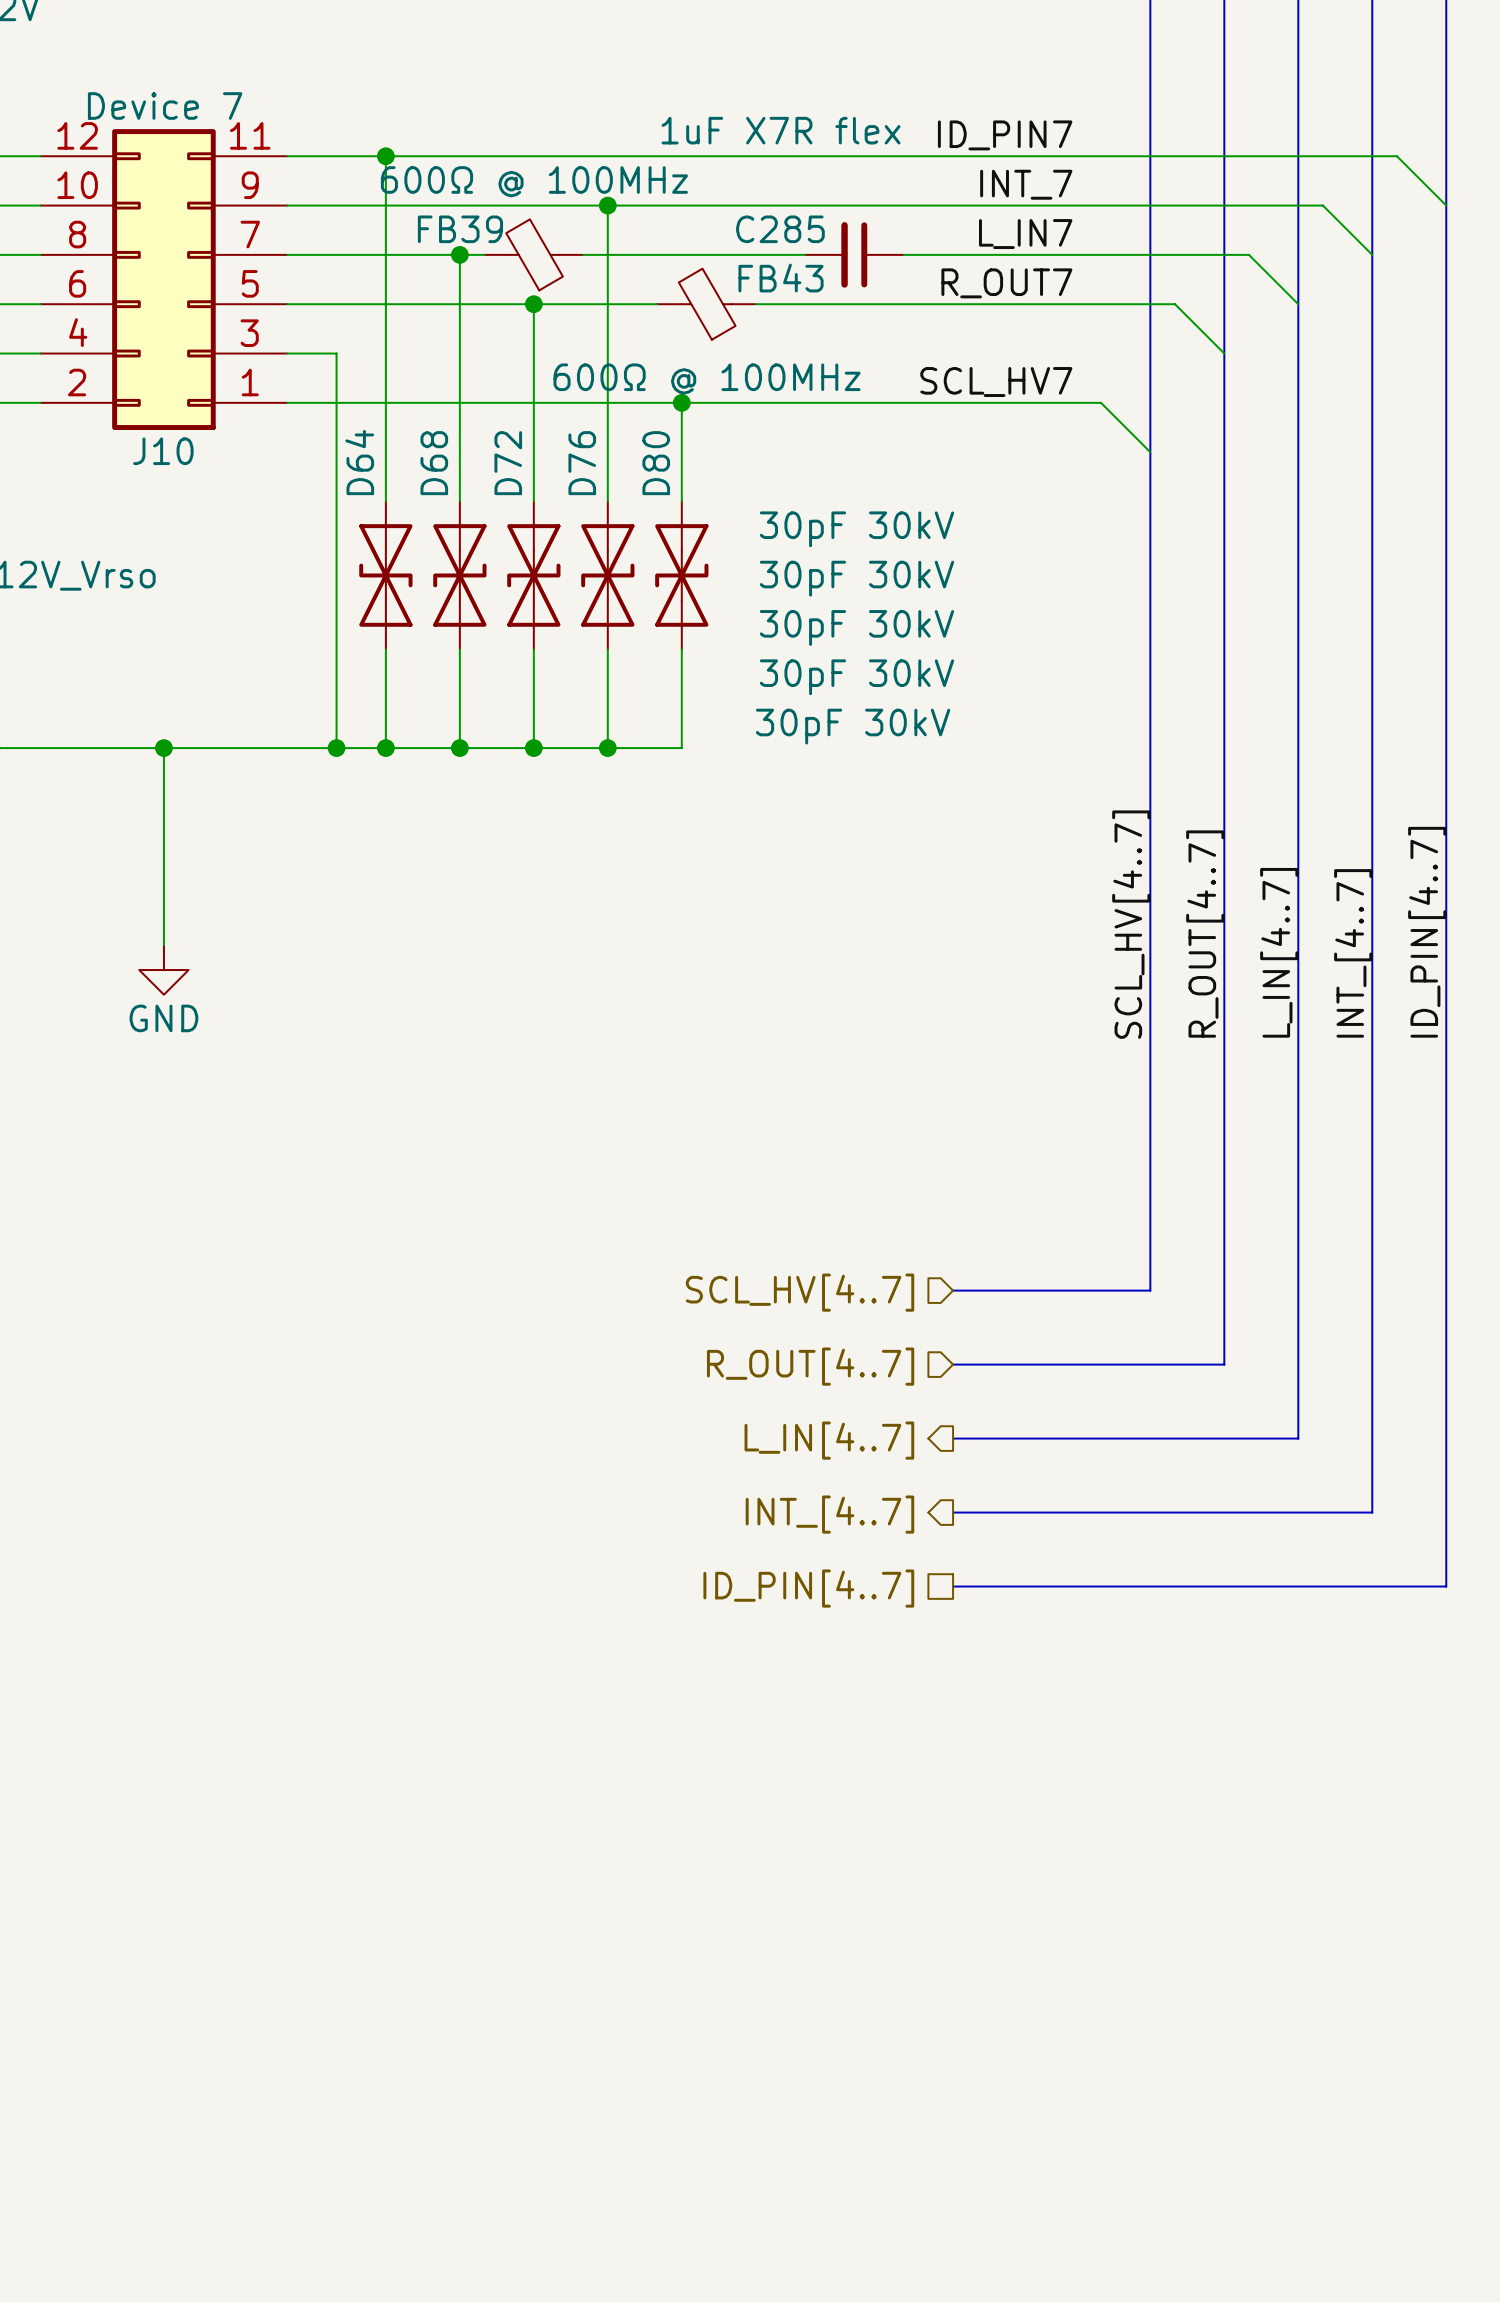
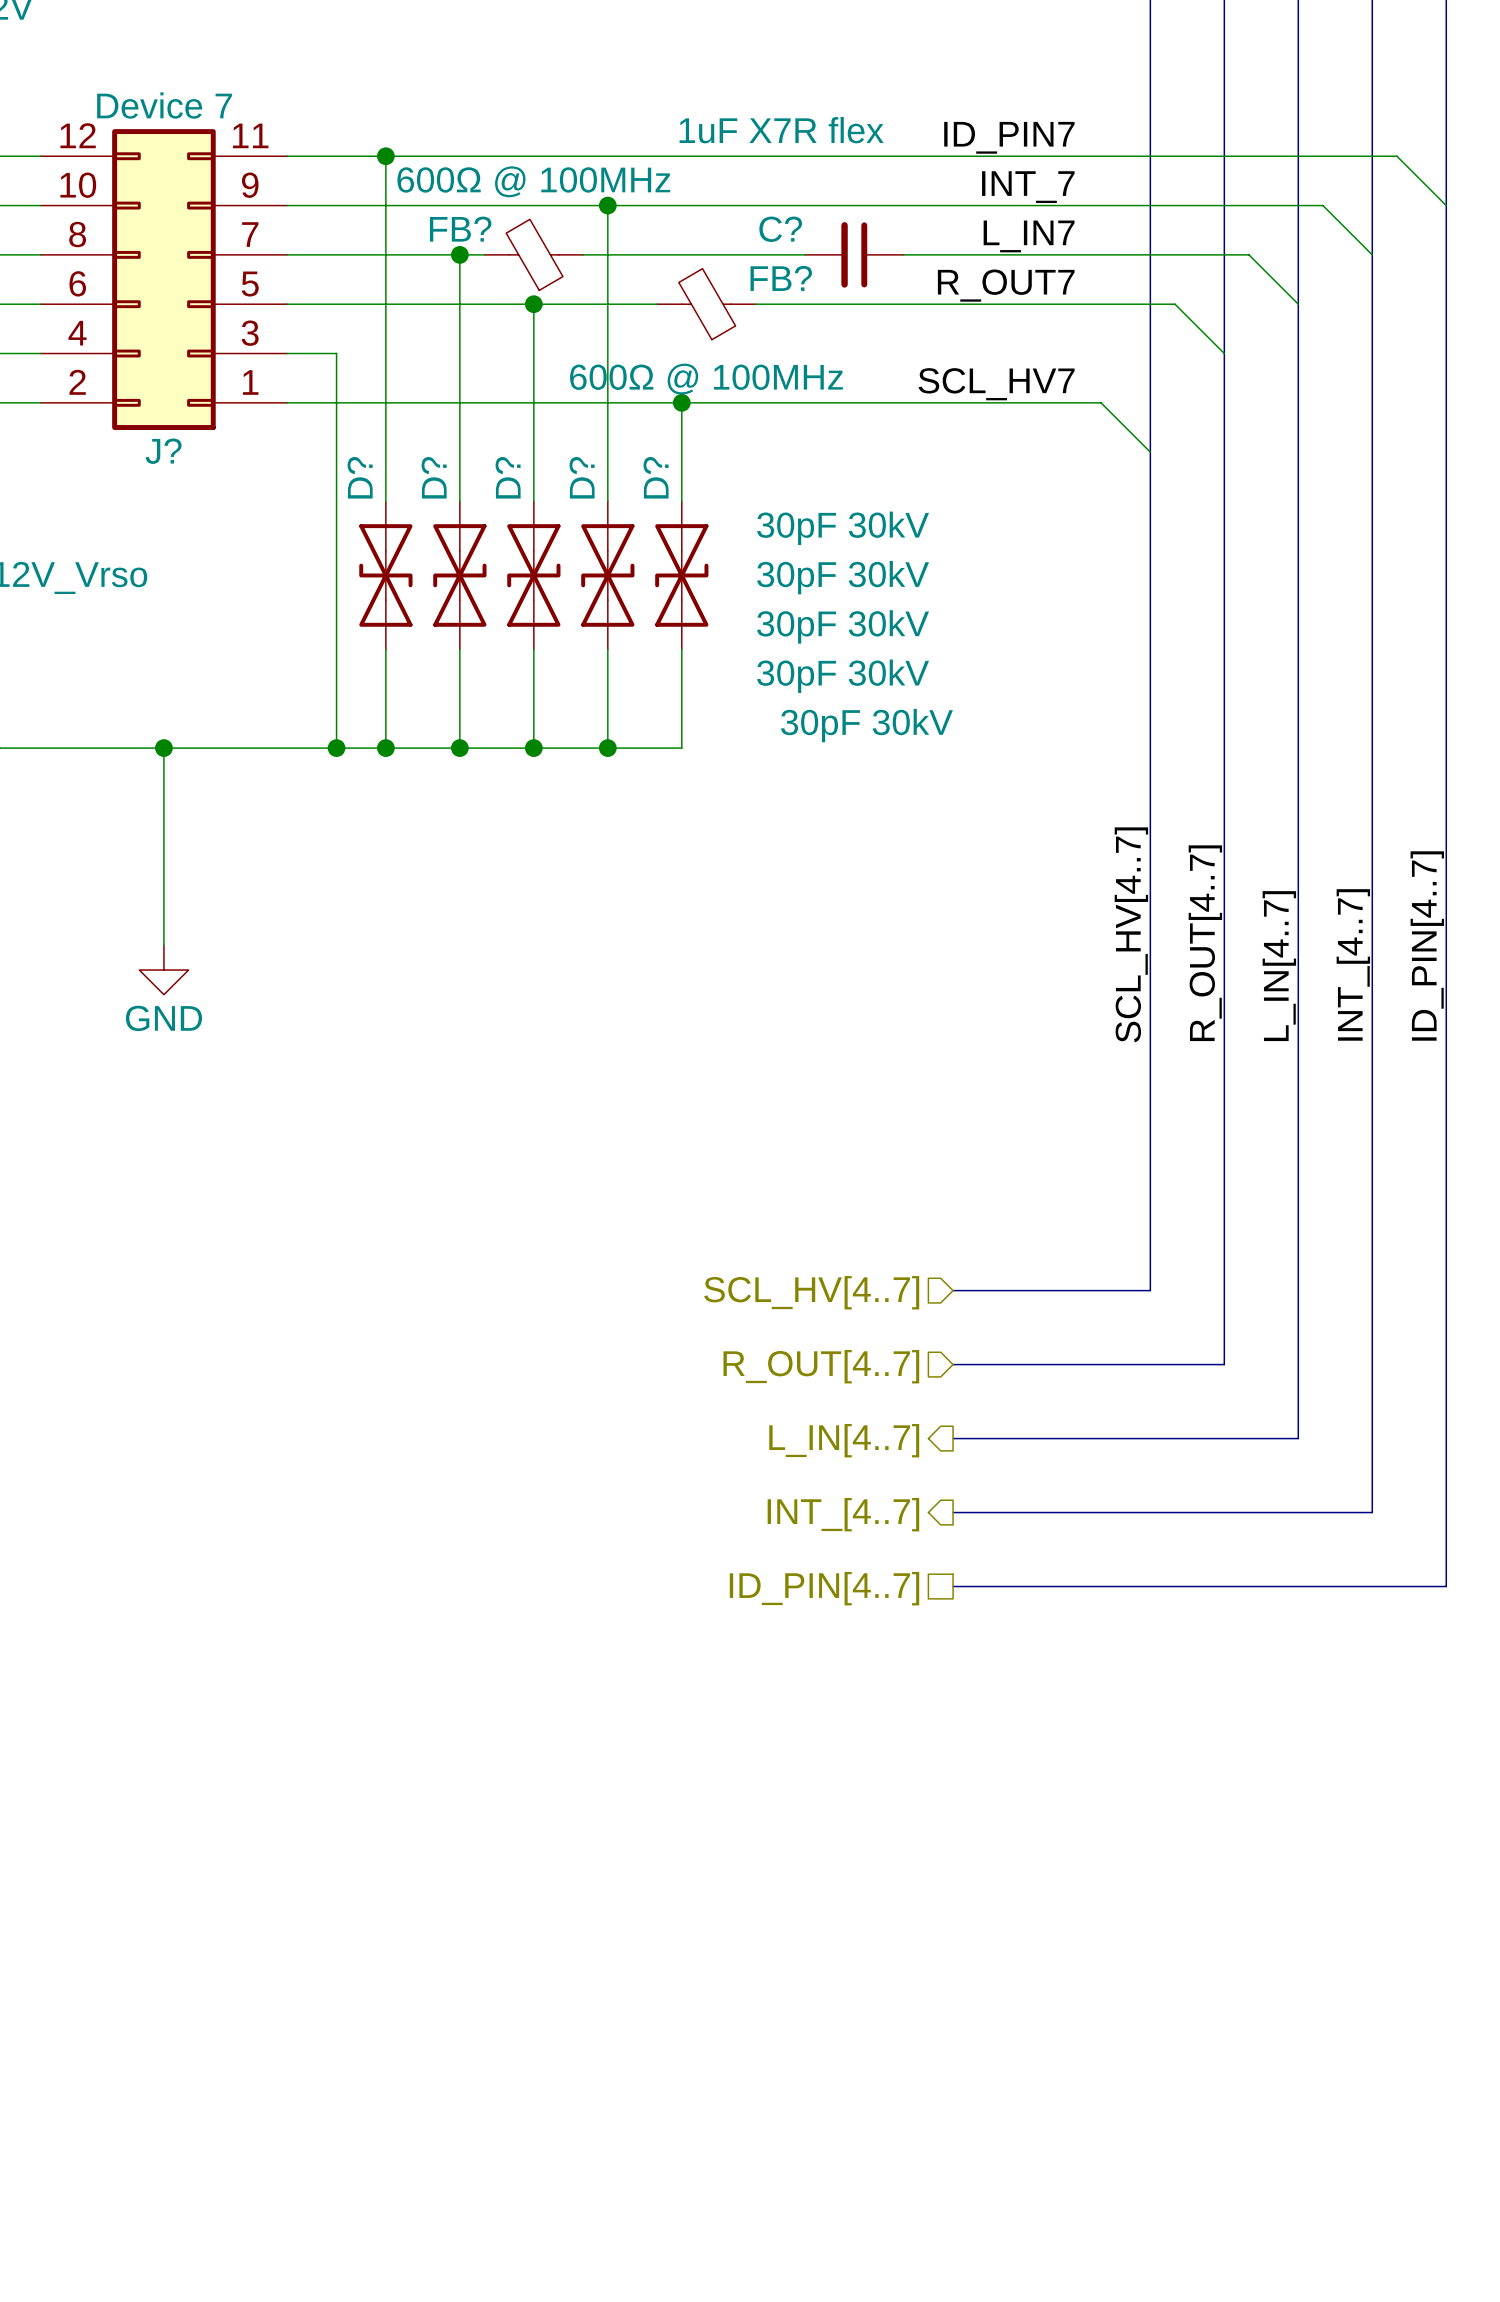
FB39 name: FB39 (460, 229) -> FB? (460, 229)
C285 name: C285 (780, 229) -> C? (780, 229)
FB43 name: FB43 (781, 278) -> FB? (781, 278)
J10 name: J10 (163, 451) -> J? (163, 451)
D64 name: D64 (359, 462) -> D? (360, 477)
D68 name: D68 (434, 463) -> D? (434, 477)
D72 name: D72 (508, 463) -> D? (508, 477)
D76 name: D76 (582, 463) -> D? (582, 477)
D80 name: D80 (656, 463) -> D? (656, 477)

